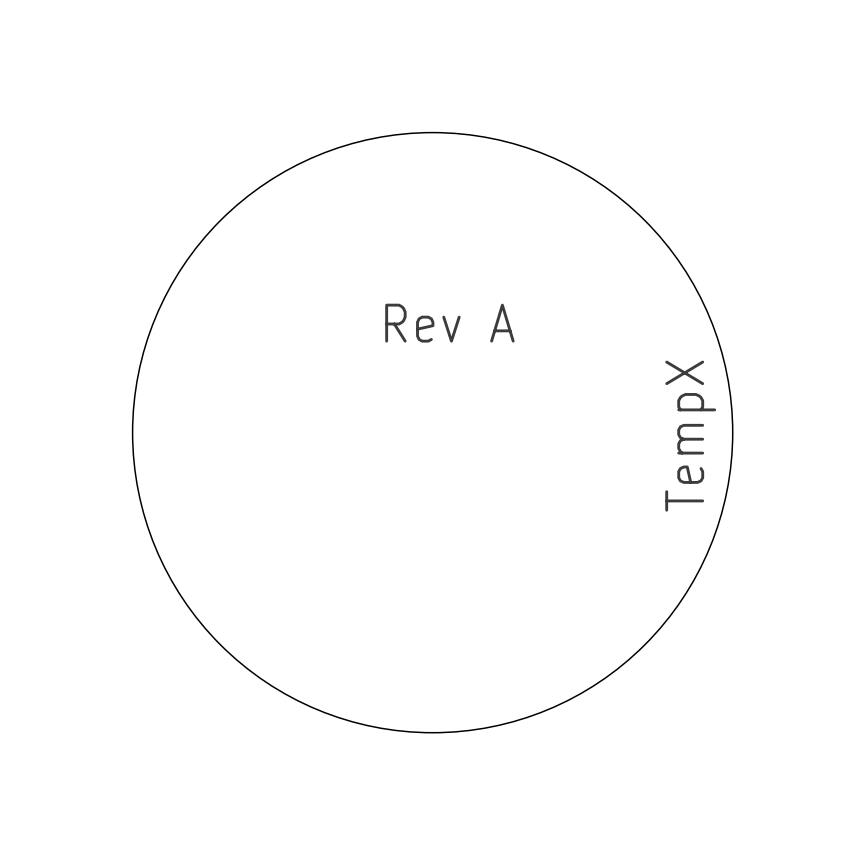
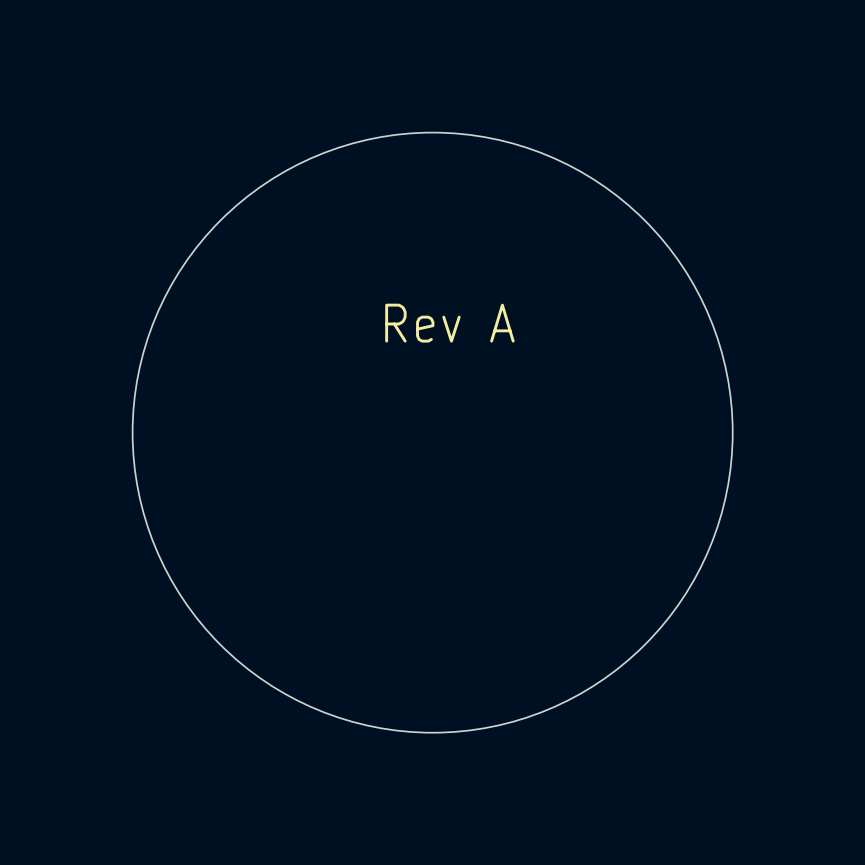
text: TempX (690, 436) -> none

